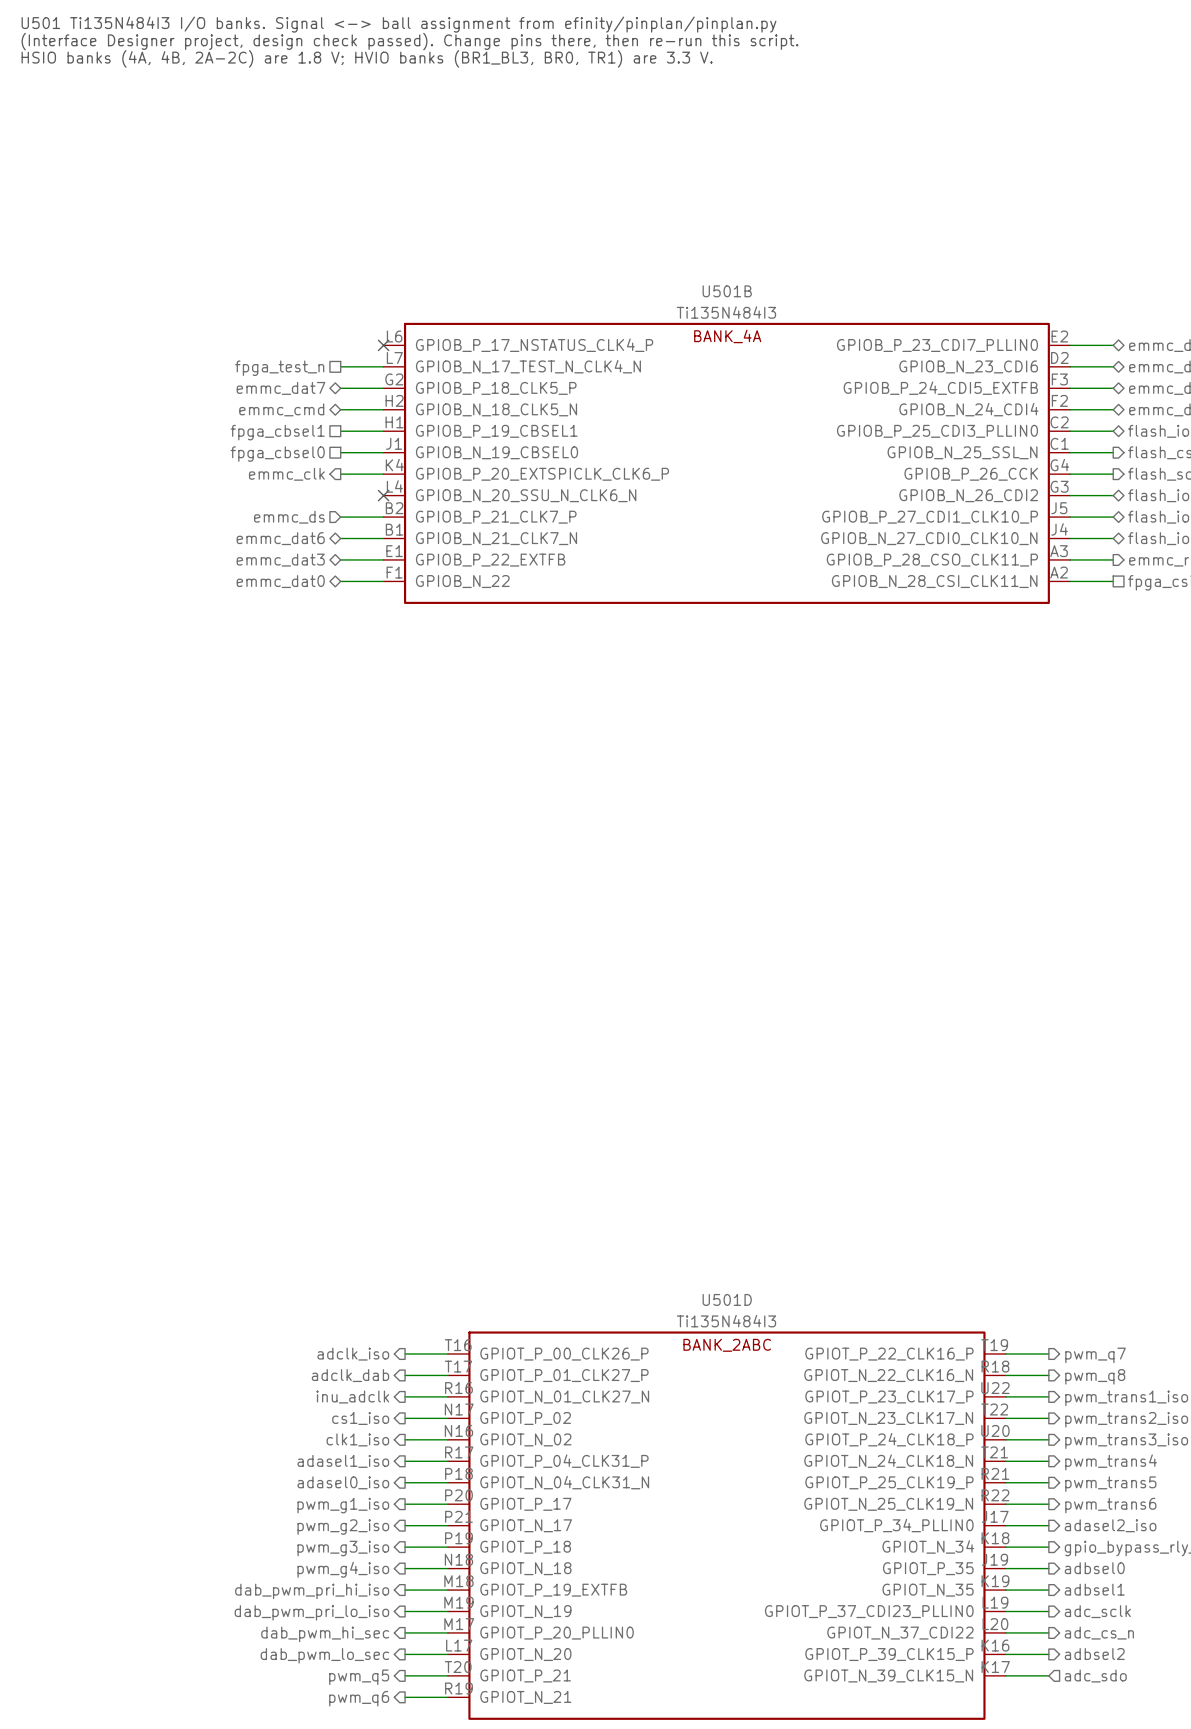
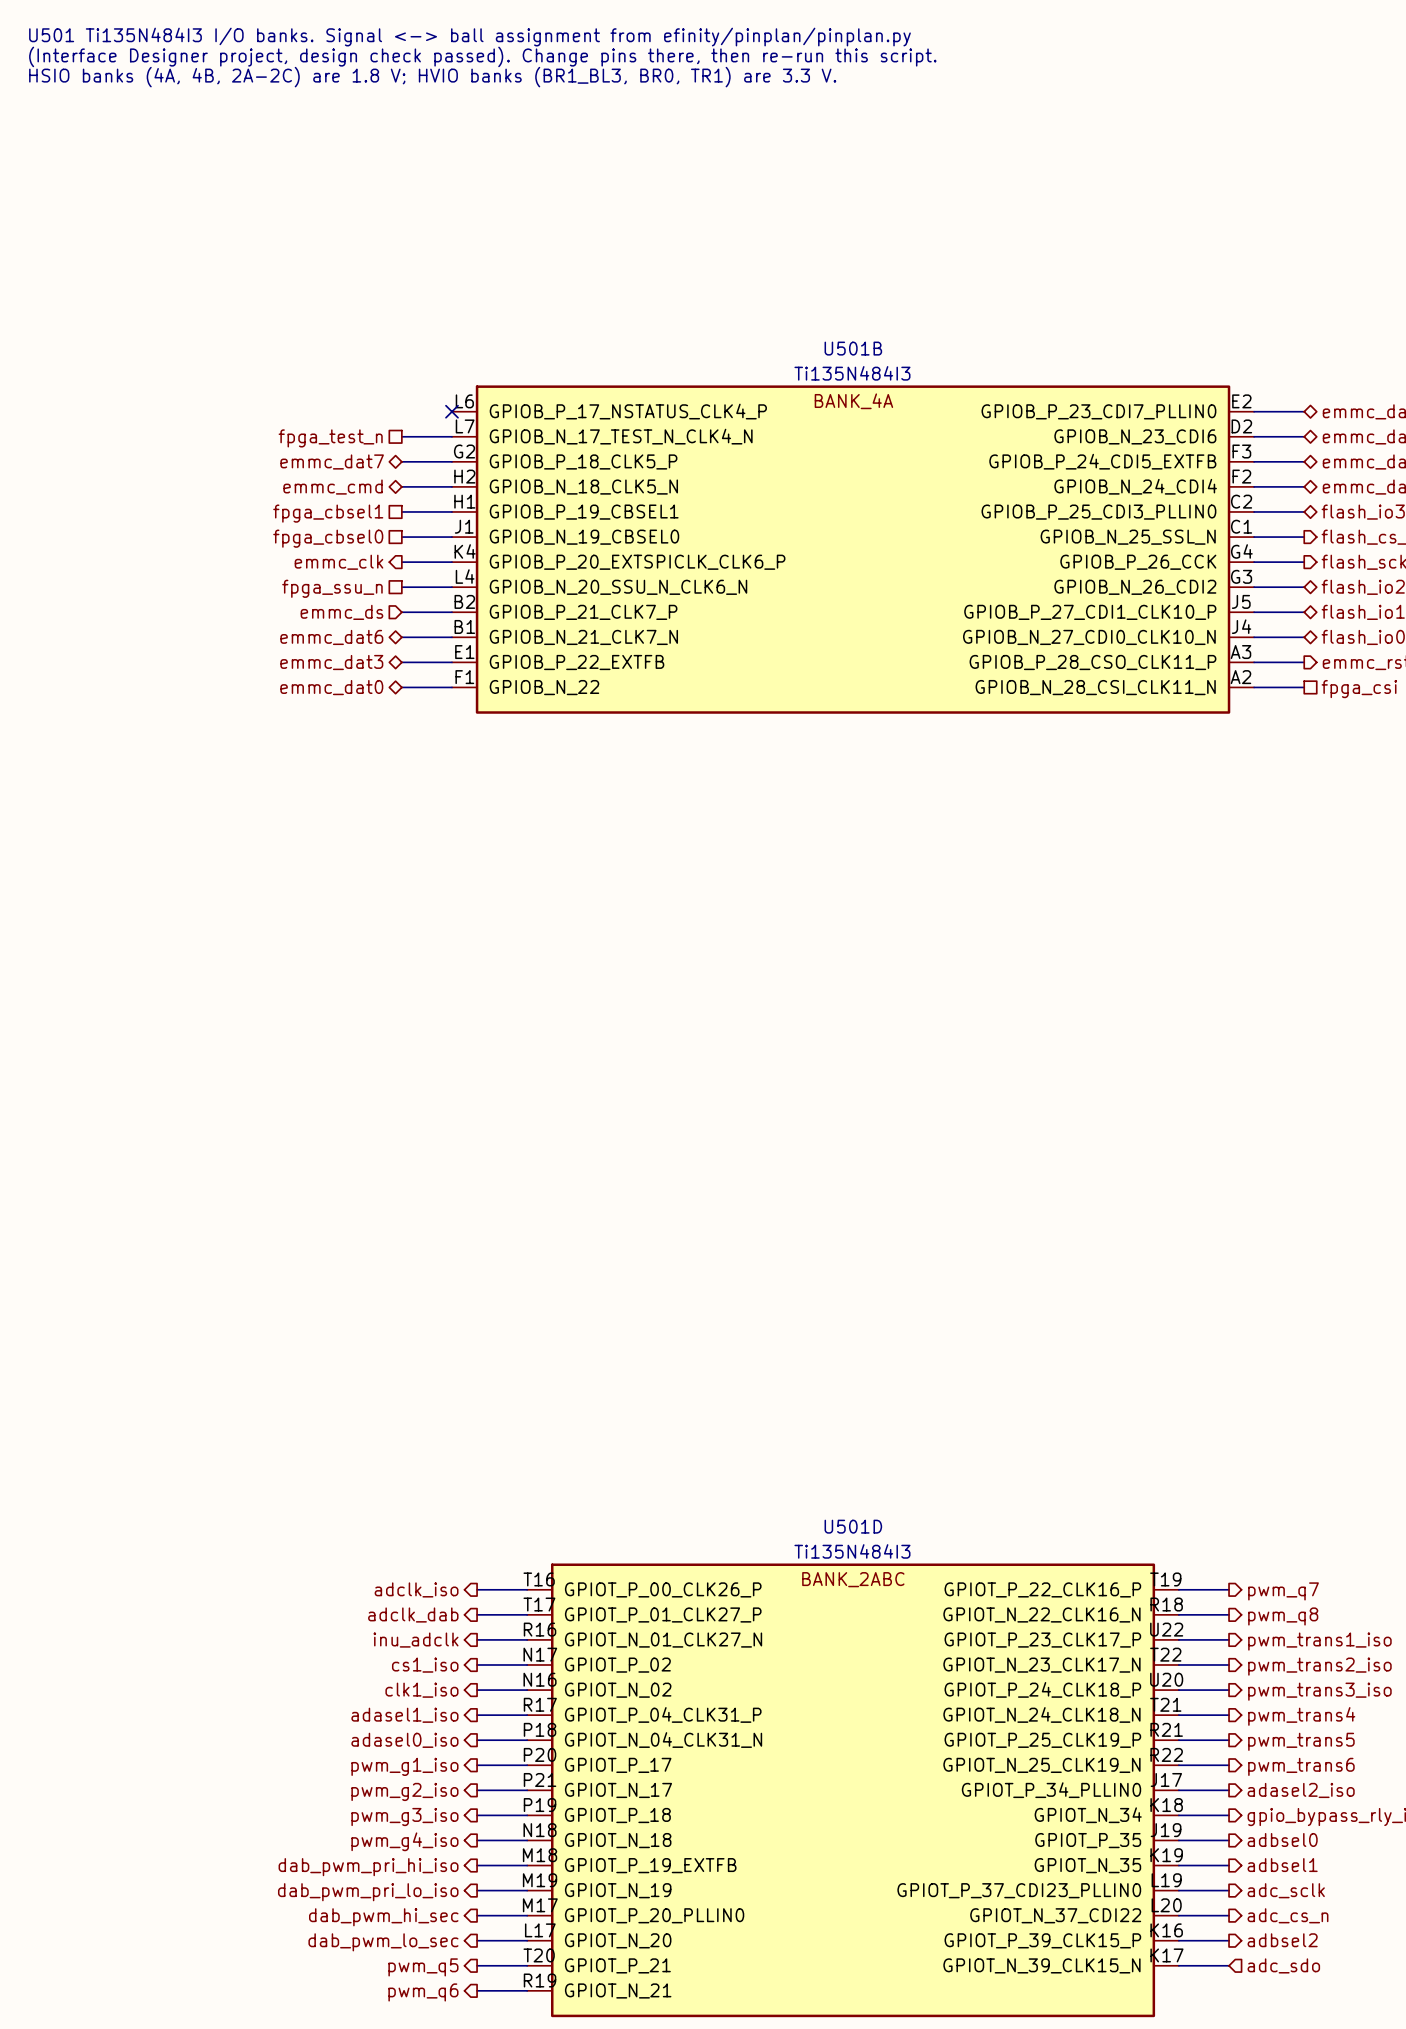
wire: none -> (401, 587) (451, 587)
no-connect mark: (383, 495) -> none
hierarchical label: none -> fpga_ssu_n (332, 588)

